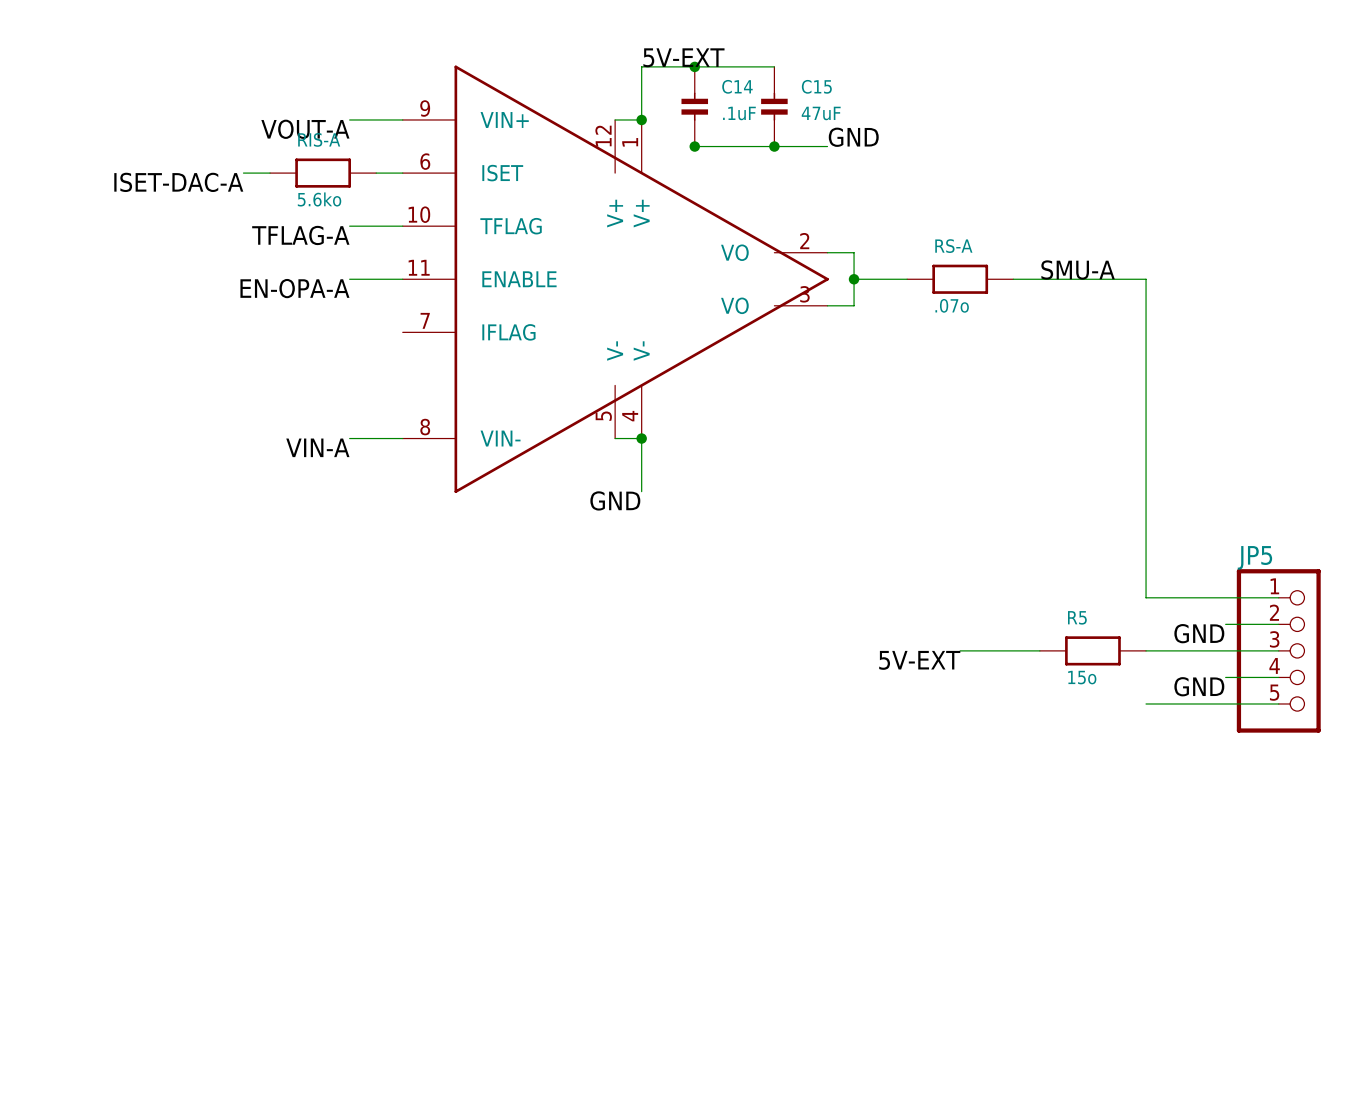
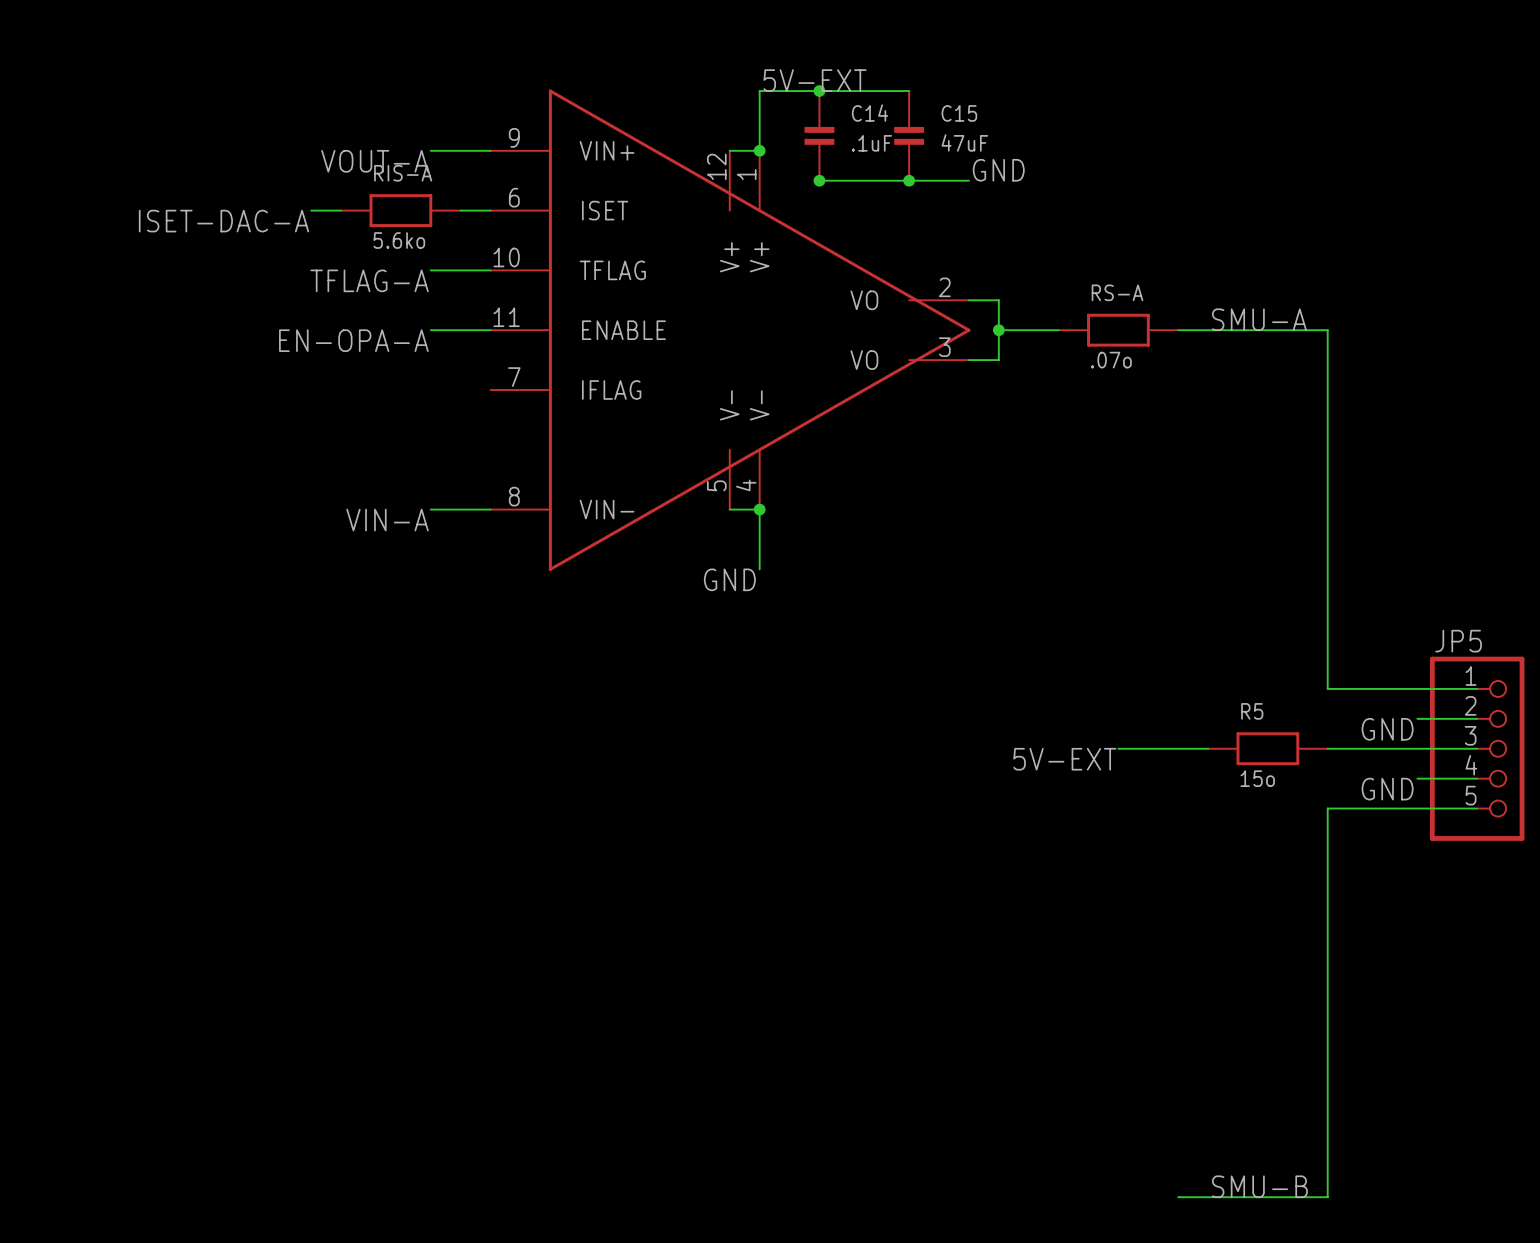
wire: none -> (1327, 808) (1327, 1197) (1178, 1197)
label: none -> SMU-B (1259, 1186)

